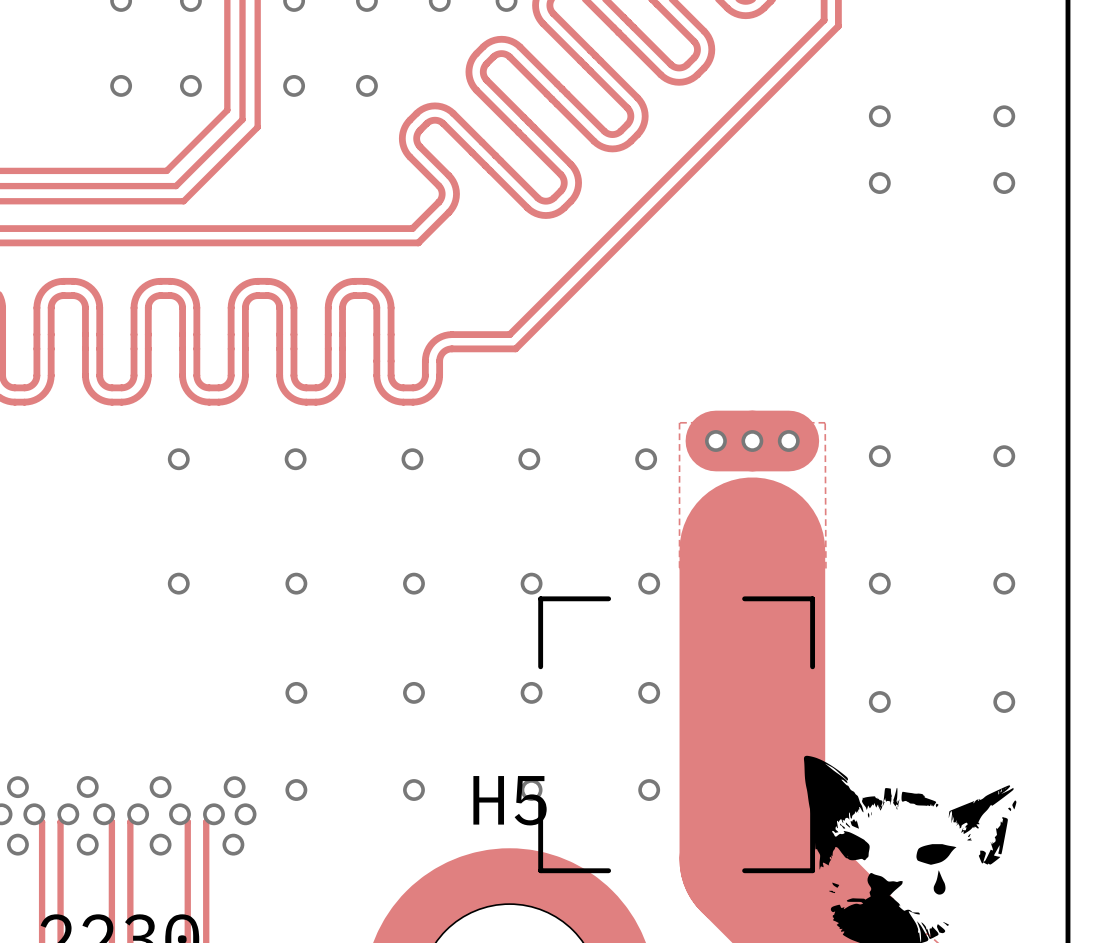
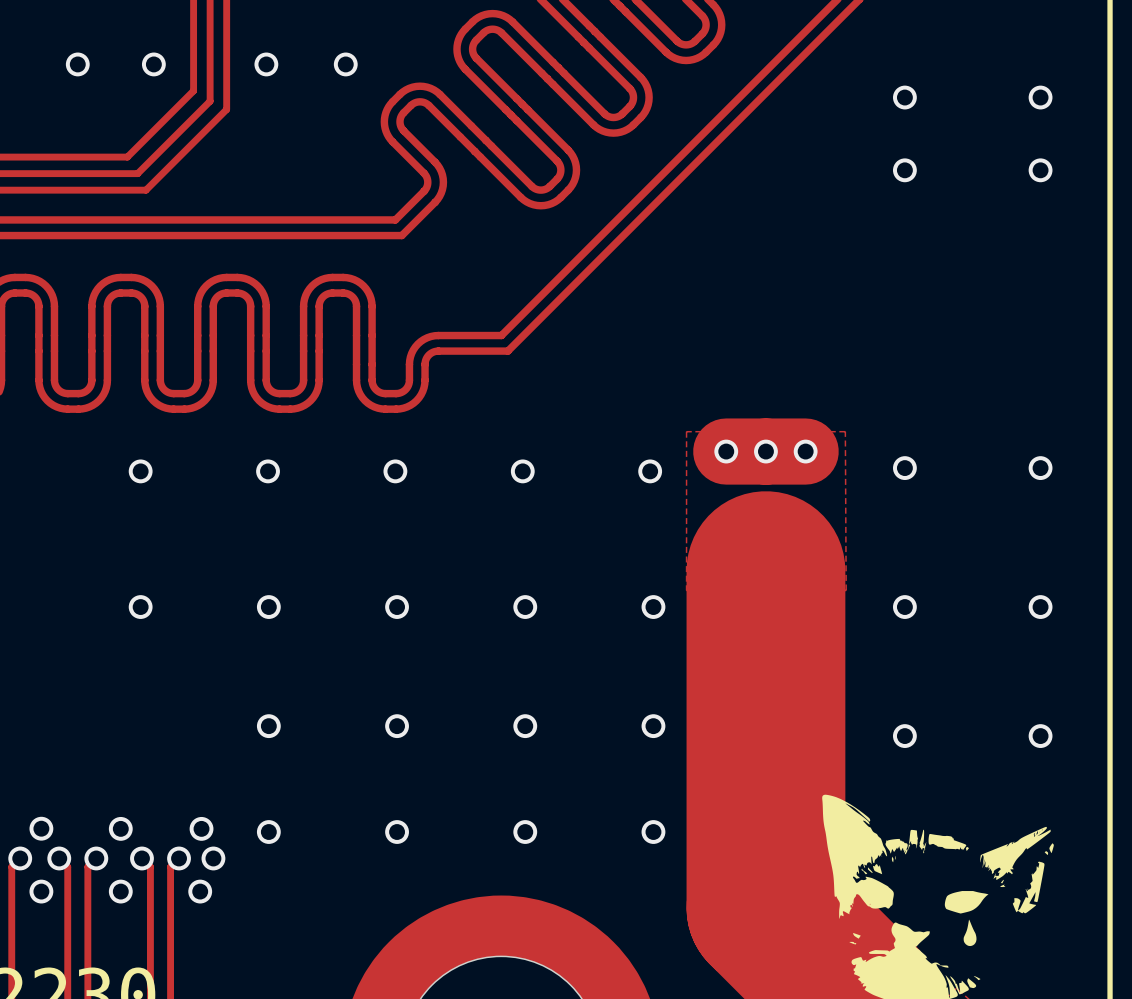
drawing: [538, 596, 816, 874] -> none
H5 name: H5 (510, 800) -> none

